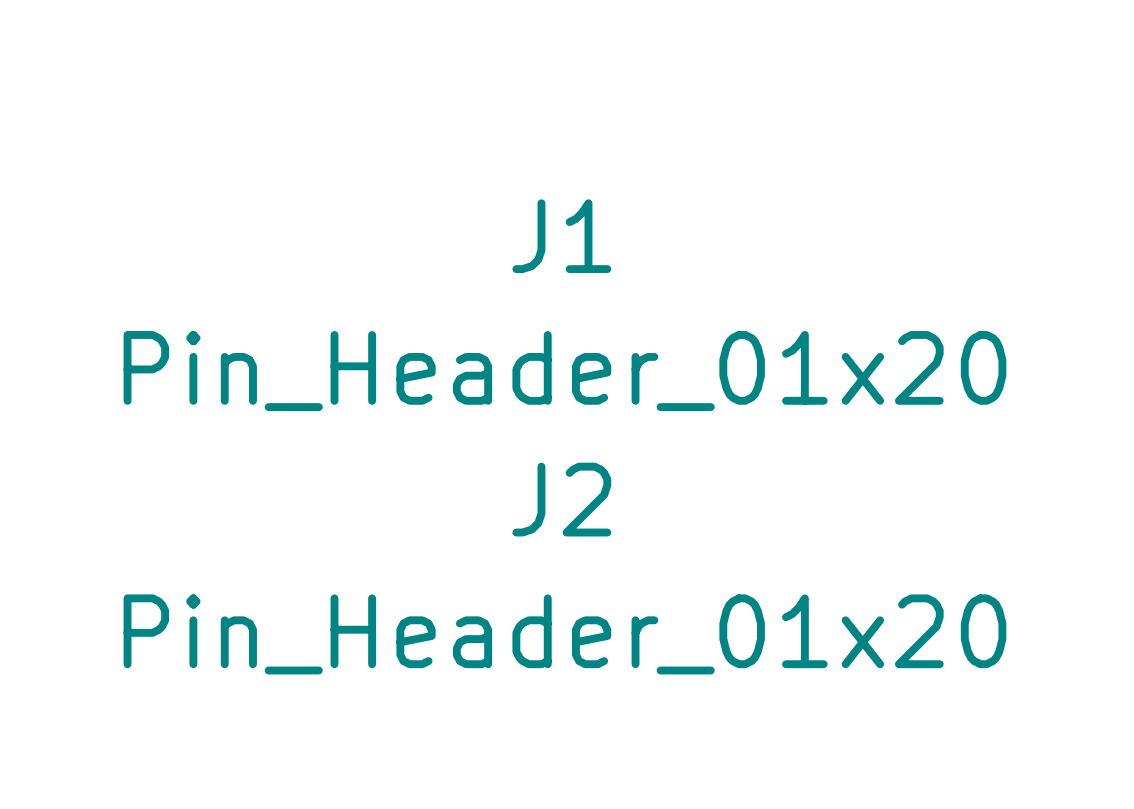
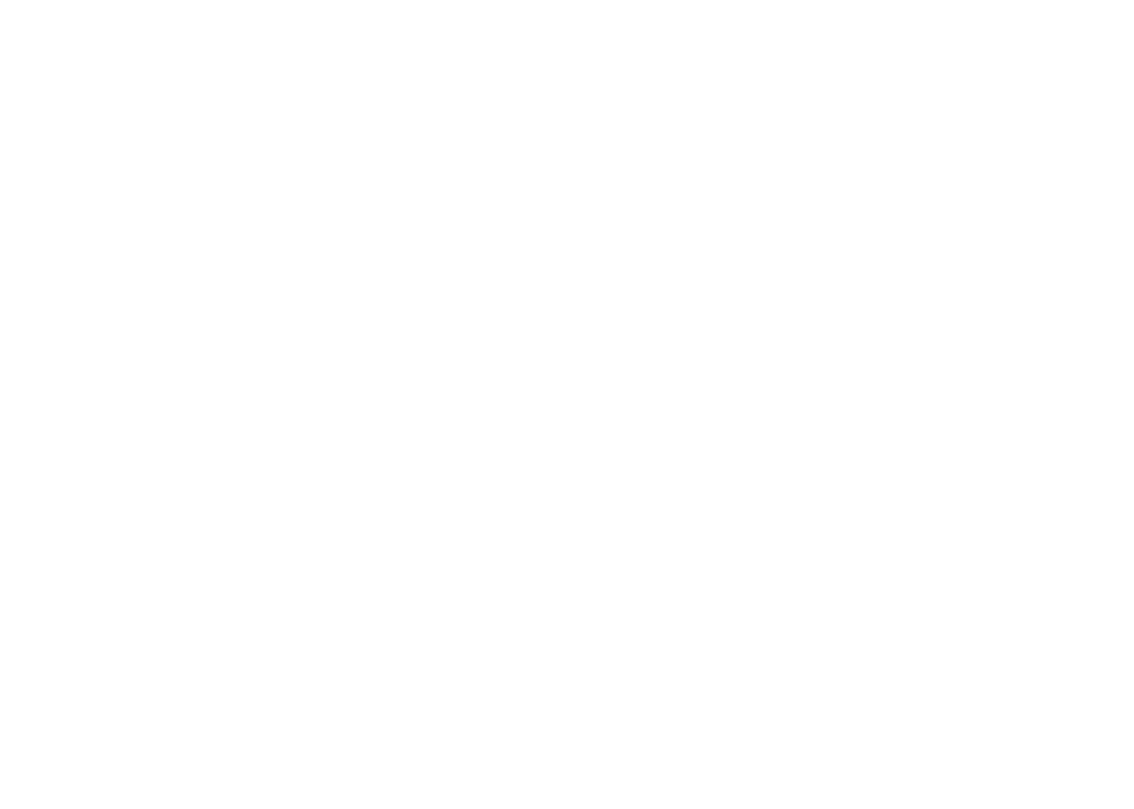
J1: Pin_Header_01x20 (564, 305) -> none
J2: Pin_Header_01x20 (564, 568) -> none

